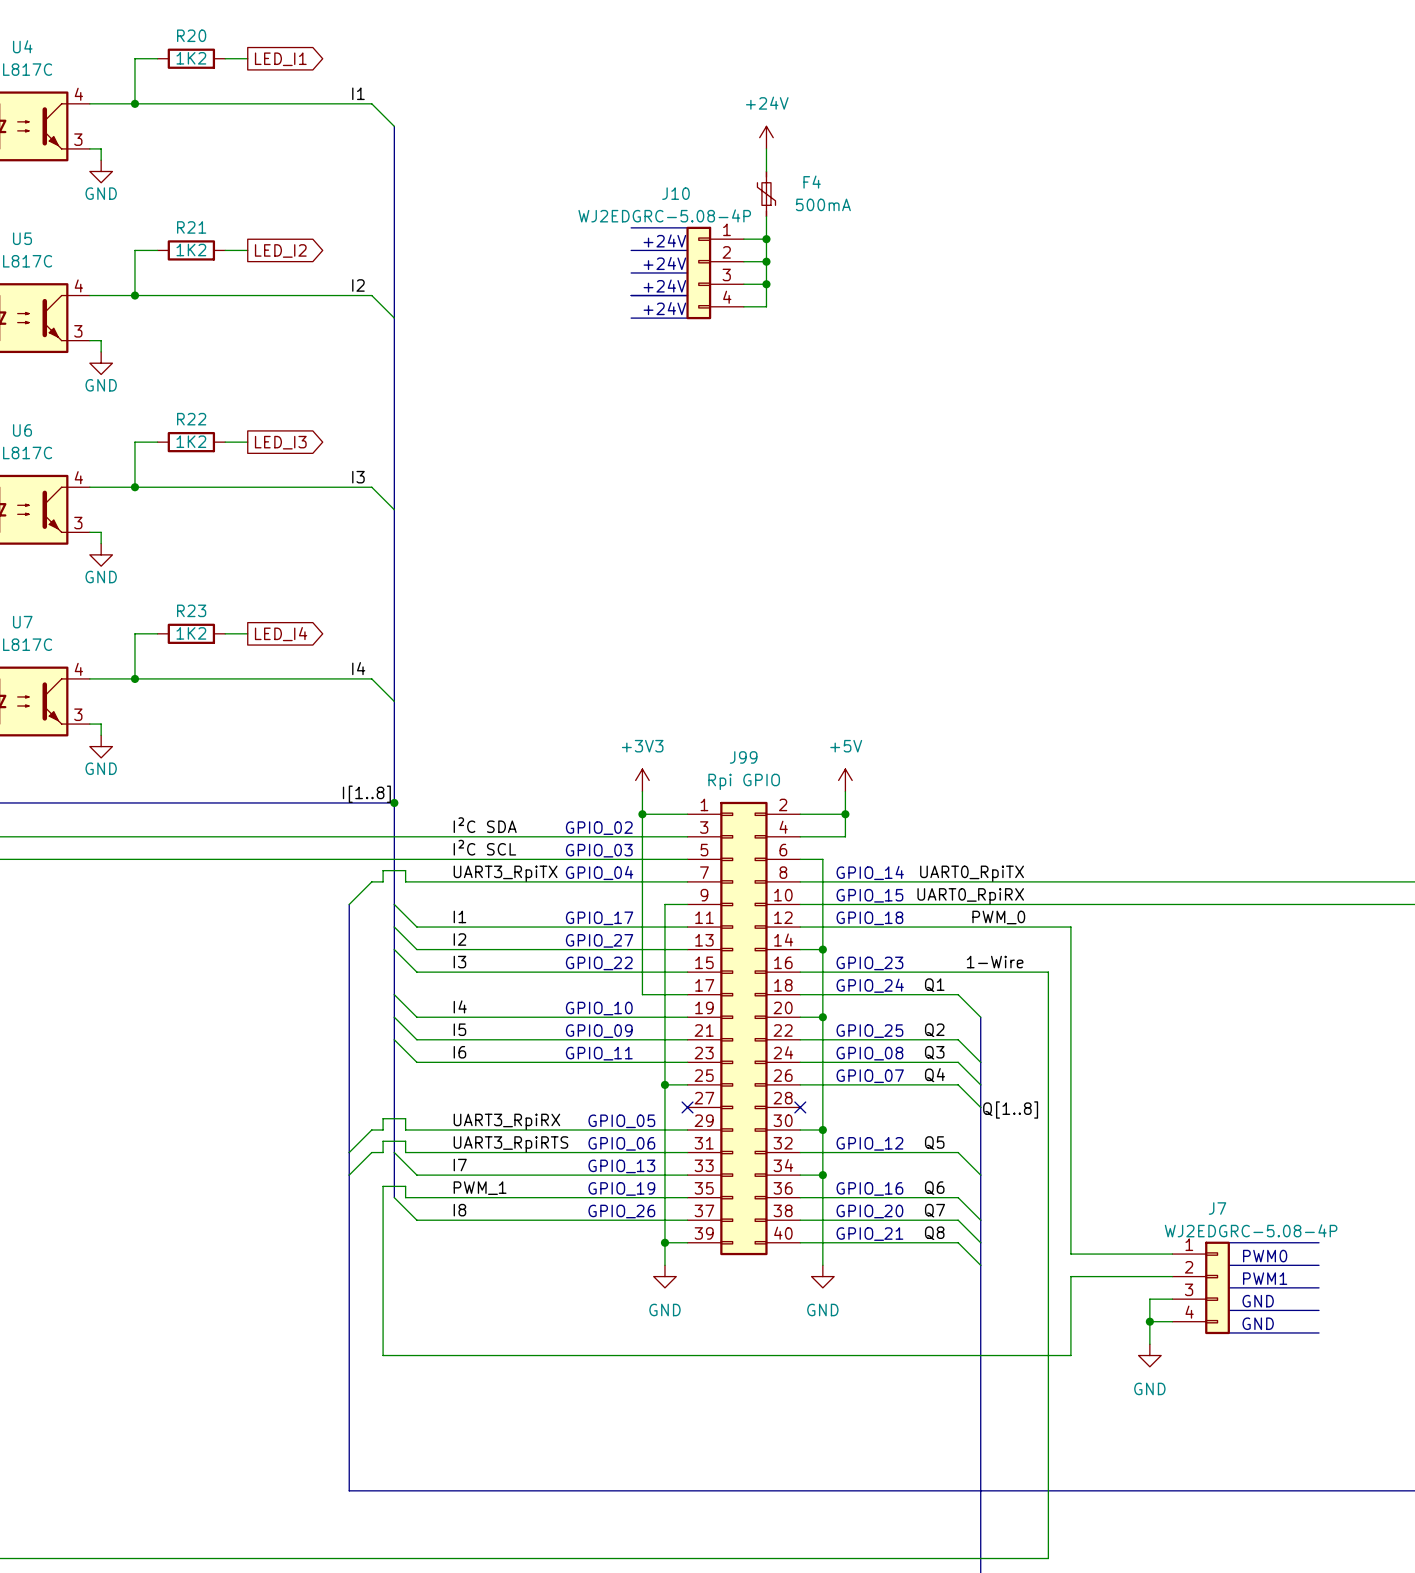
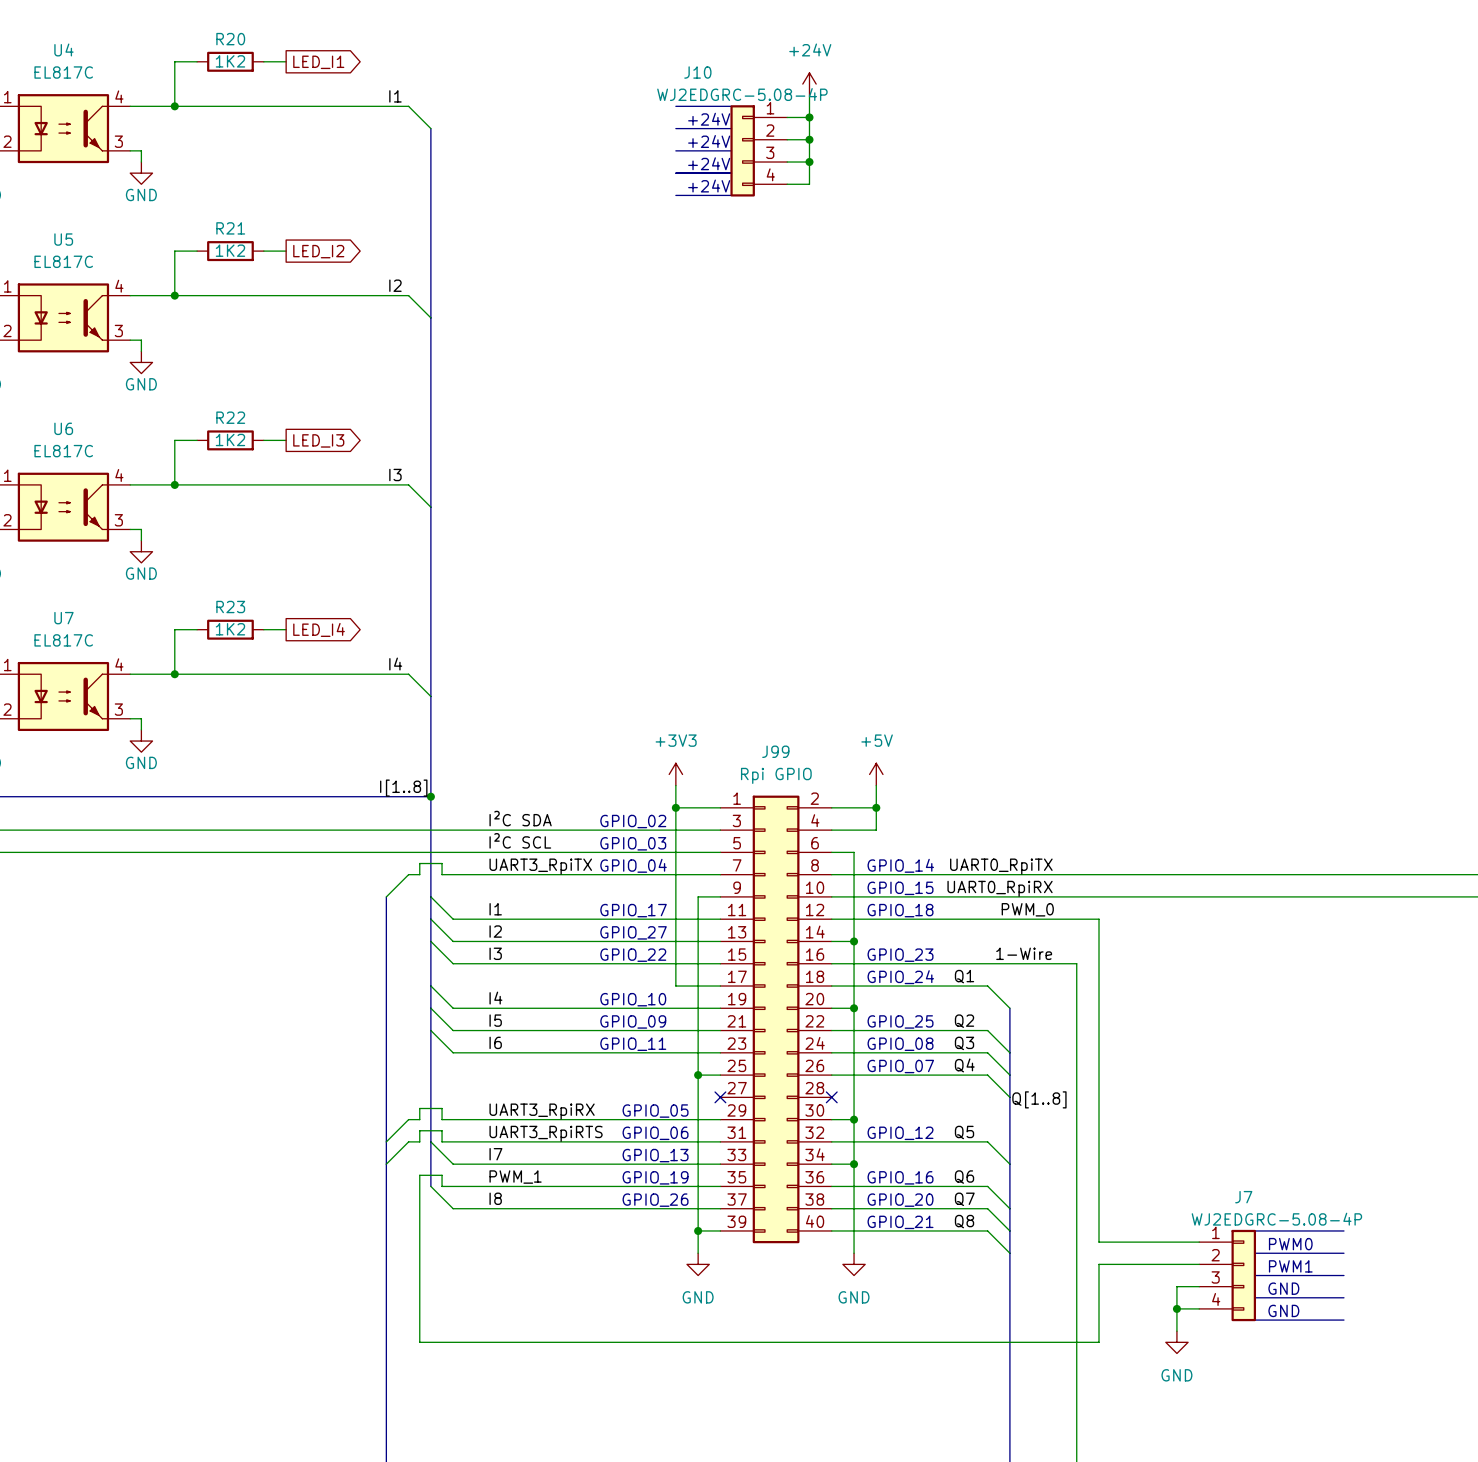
junction: none -> (809, 117)
text: none -> +24V (709, 119)
power symbol position: +24V (766, 137) -> +24V (809, 84)
junction: none -> (809, 139)
text: none -> +24V (709, 141)
wire: (766, 148) (766, 171) -> none
junction: none -> (809, 162)
text: none -> +24V (709, 163)
text: none -> +24V (709, 186)
J10 name position: J10 (675, 193) -> J10 (697, 72)
F4: 500mA (766, 194) -> none
J10 value position: WJ2EDGRC-5.08-4P (664, 215) -> WJ2EDGRC-5.08-4P (742, 94)
wire: (766, 216) (766, 306) (743, 306) -> (809, 95) (809, 184) (787, 184)
line: (631, 227) (687, 227) -> (675, 106) (731, 106)
wire: (743, 239) (766, 239) -> (787, 117) (809, 117)
junction: (766, 239) -> none
text: +24V (664, 240) -> none
line: (631, 250) (687, 250) -> (675, 128) (731, 128)
wire: (743, 261) (766, 261) -> (787, 139) (809, 139)
junction: (766, 261) -> none
text: +24V (664, 263) -> none
line: (631, 272) (687, 272) -> (675, 150) (731, 150)
J10 position: (715, 272) -> (758, 150)
wire: (743, 284) (766, 284) -> (787, 162) (809, 162)
junction: (766, 284) -> none
text: +24V (664, 286) -> none
line: (631, 295) (687, 295) -> (675, 173) (731, 173)
text: +24V (664, 308) -> none
line: (631, 318) (687, 318) -> (675, 195) (731, 195)

